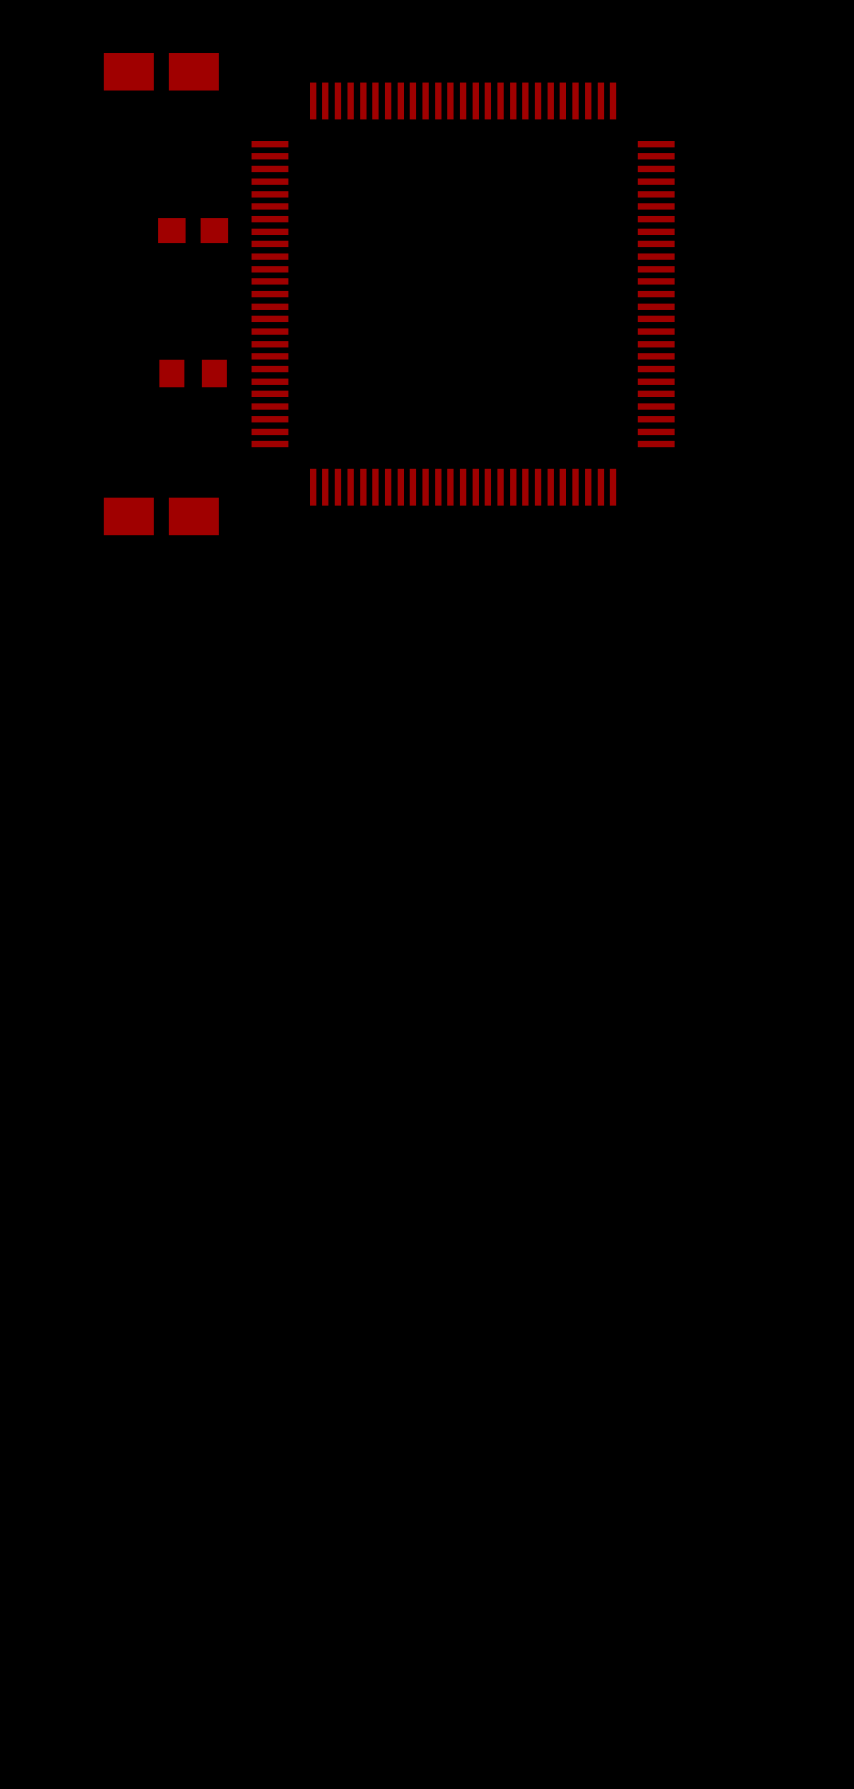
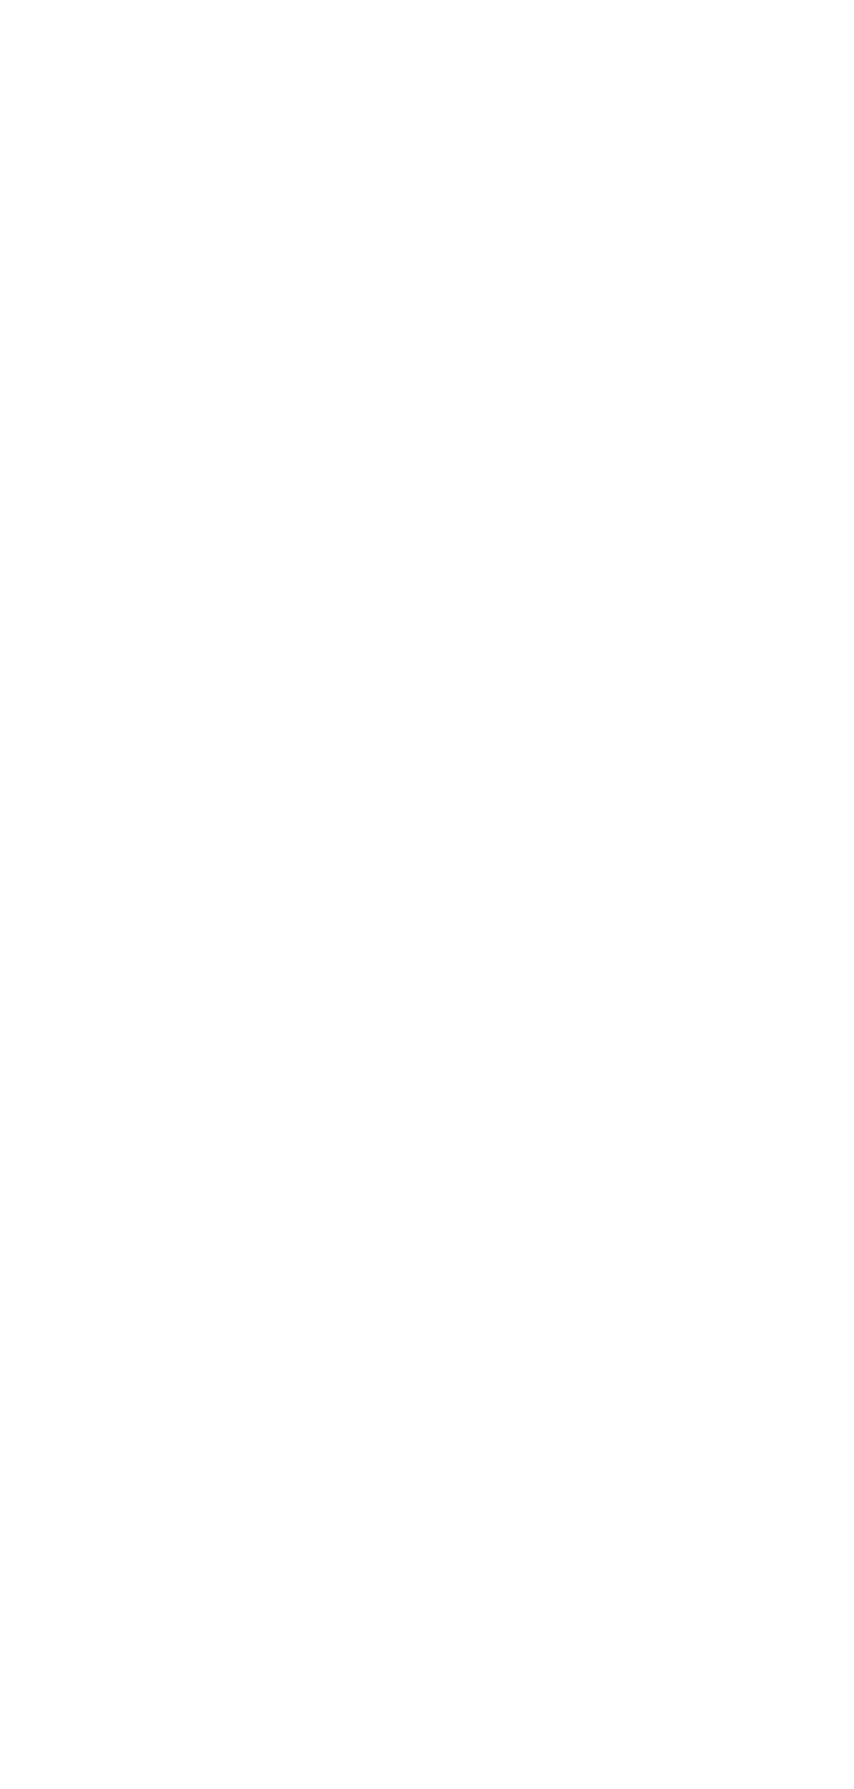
part: (161, 71) -> none
part: (193, 230) -> none
part: (463, 294) -> none
part: (193, 373) -> none
part: (161, 516) -> none

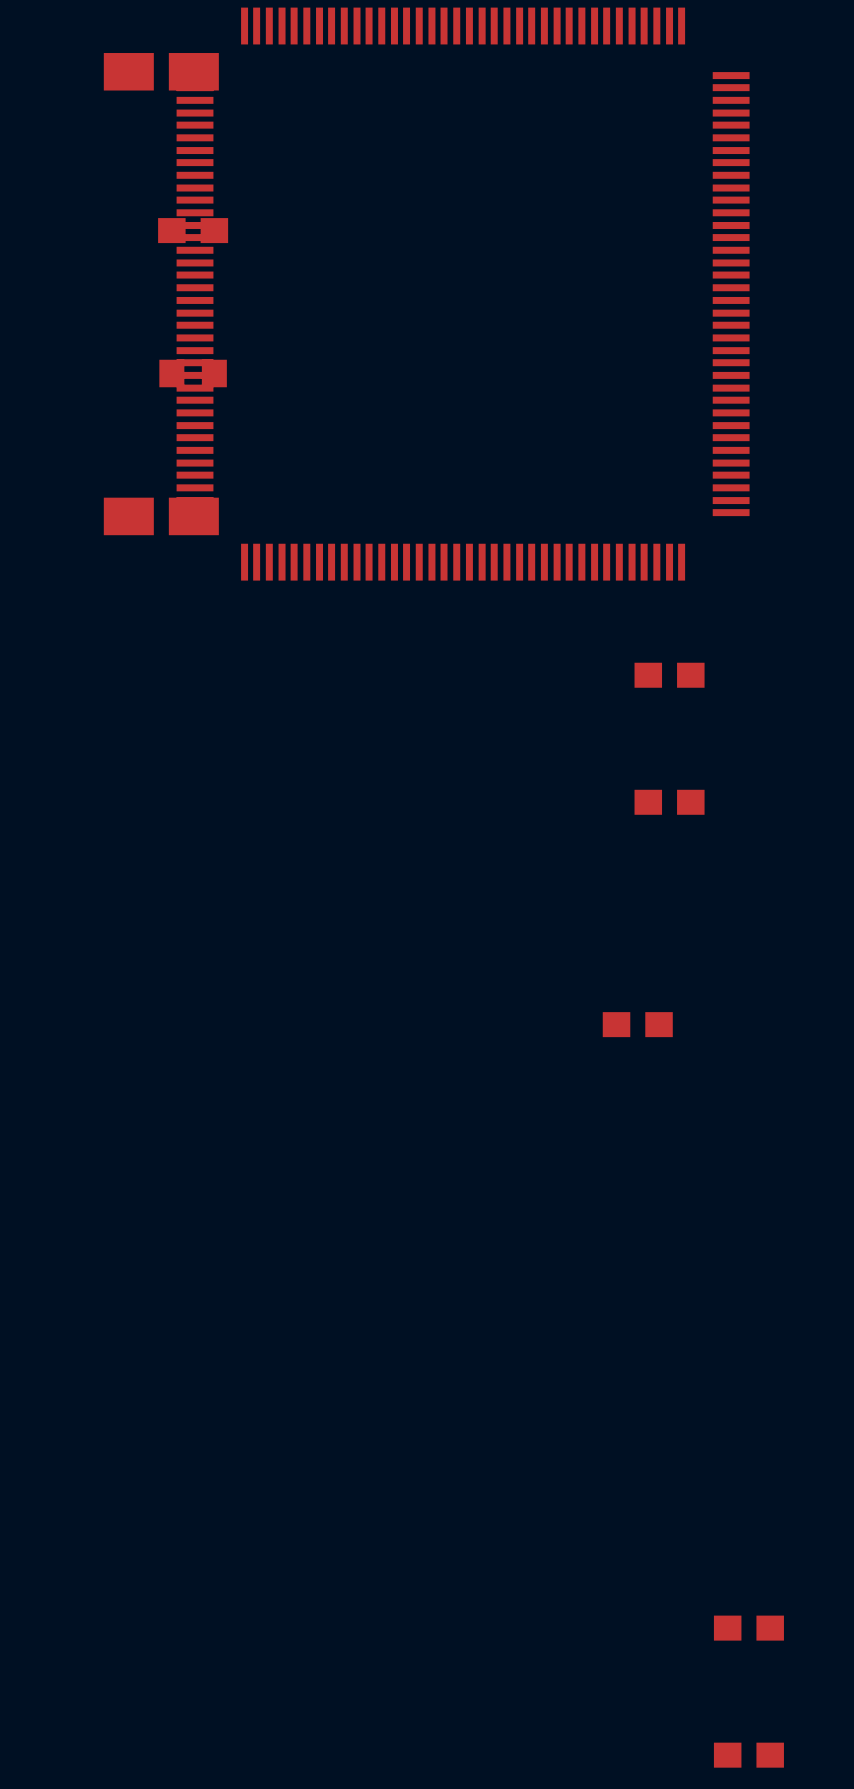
part: none -> (161, 71)
part: none -> (193, 230)
part: none -> (463, 294)
part: none -> (193, 373)
part: none -> (161, 516)
part: none -> (669, 675)
part: none -> (669, 802)
part: none -> (637, 1024)
part: none -> (748, 1628)
part: none -> (748, 1755)

